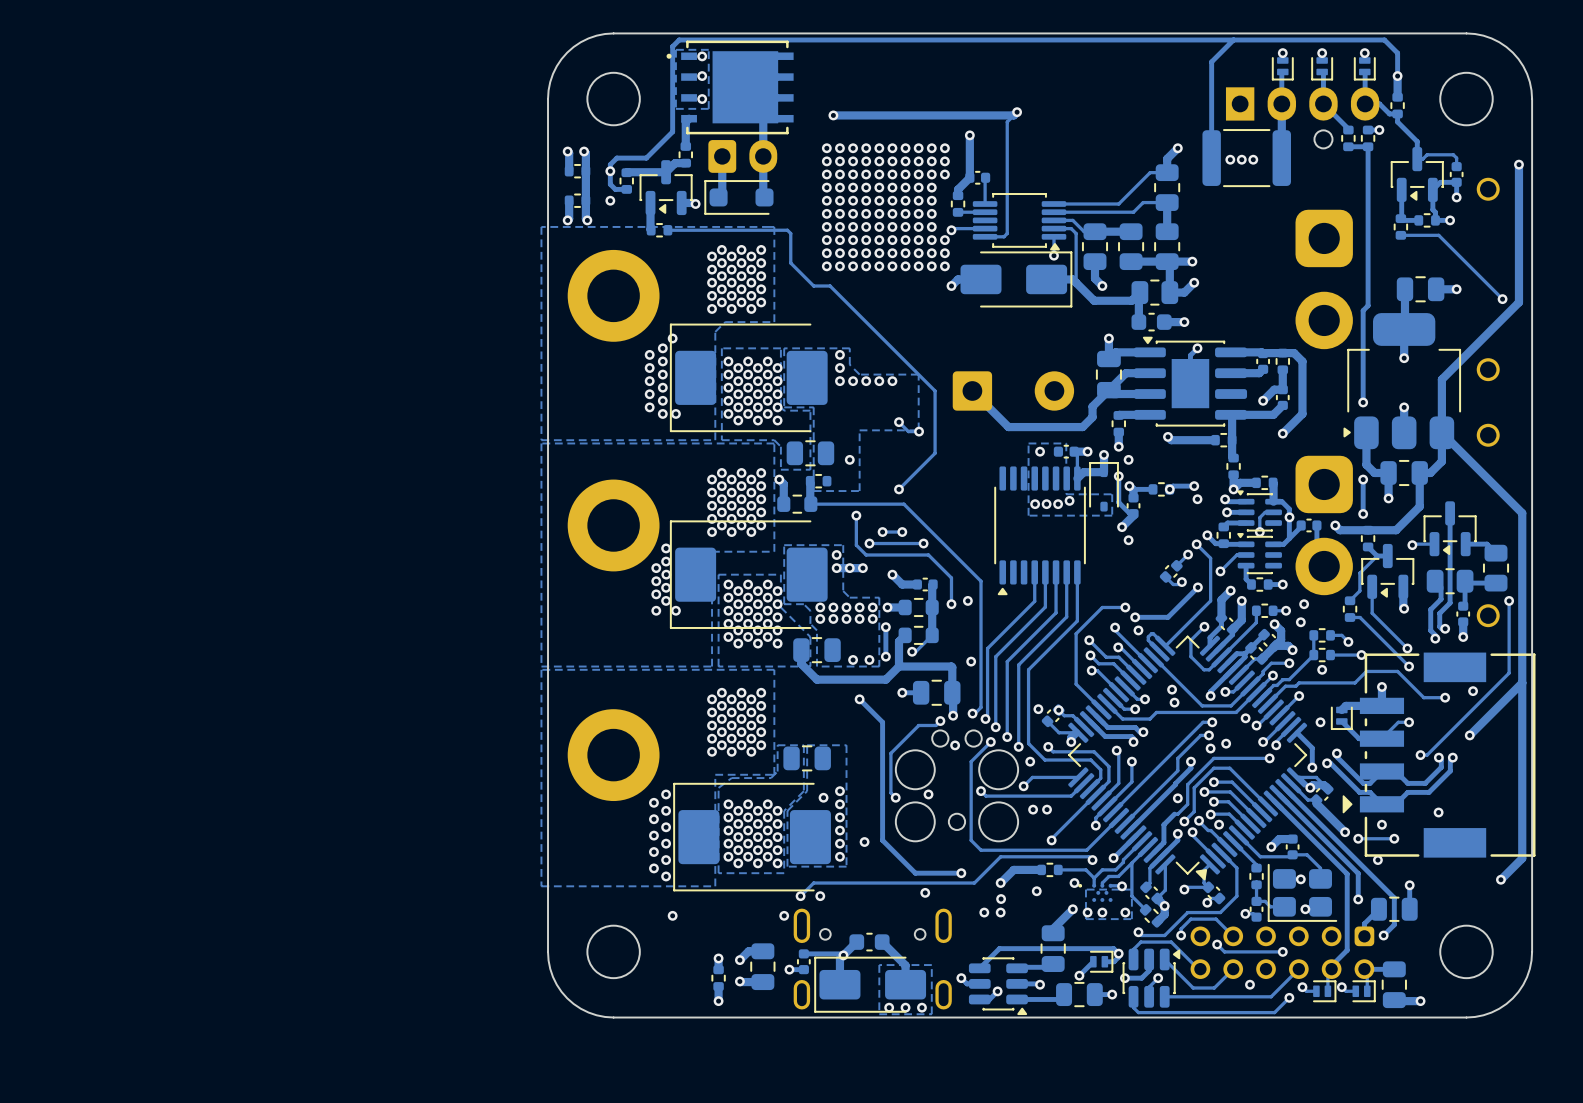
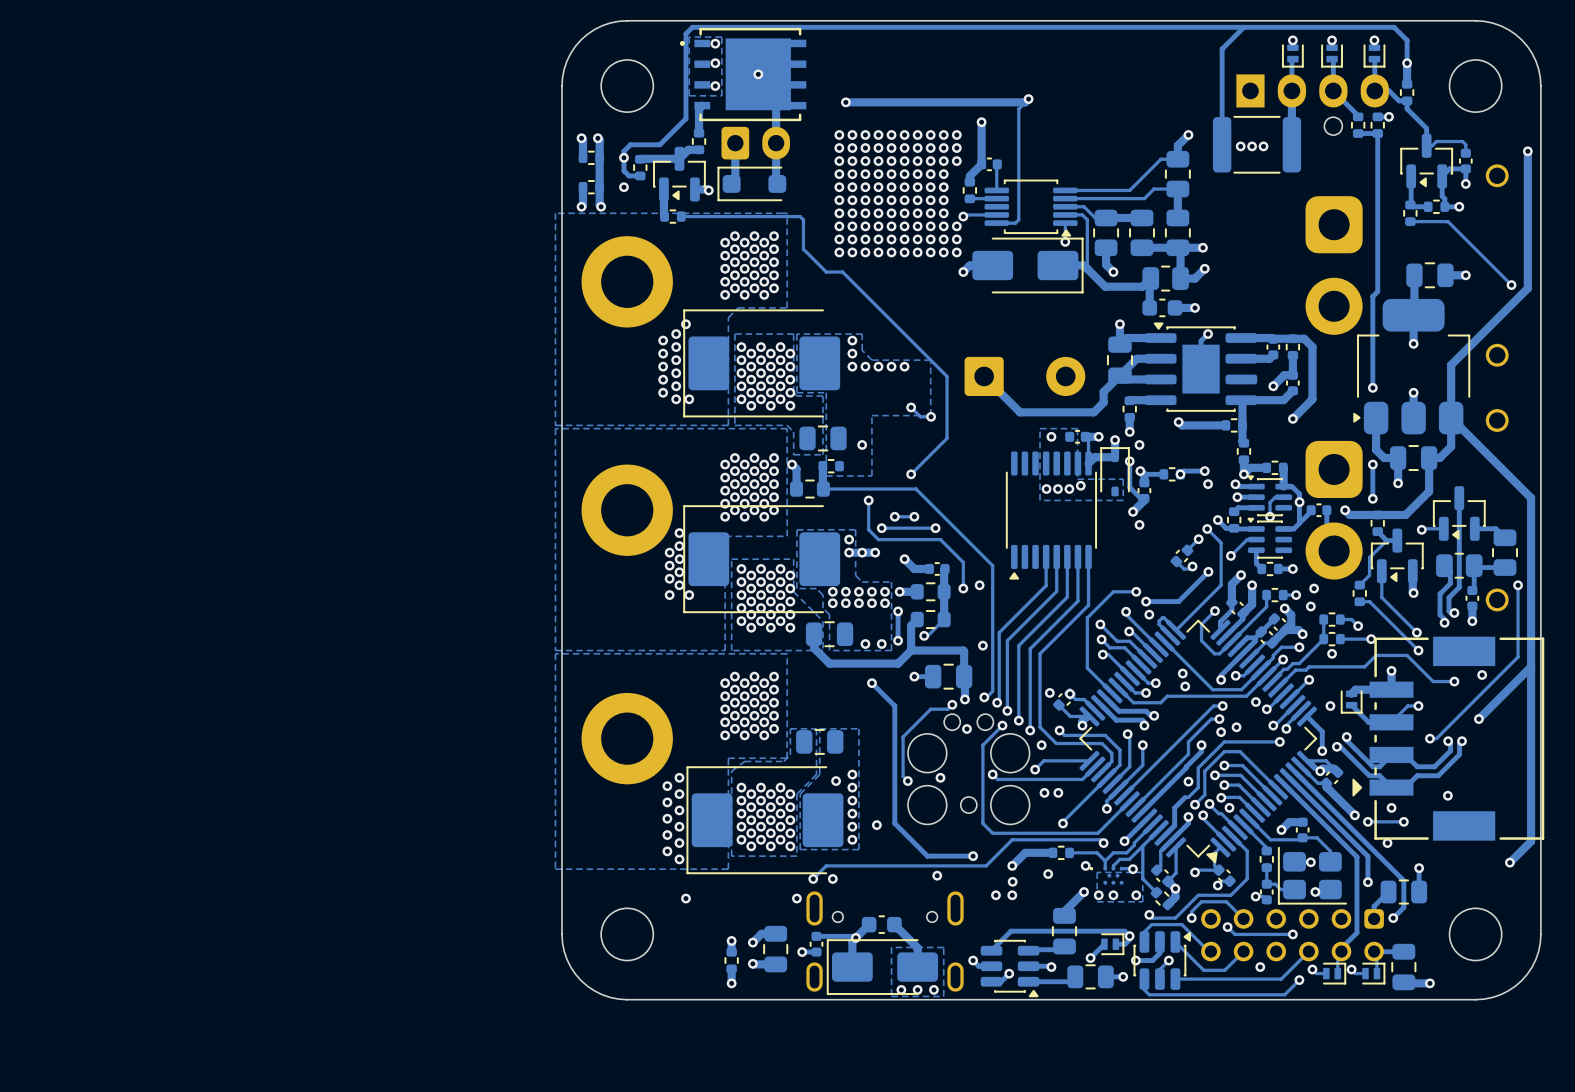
via: none -> (758, 74)

